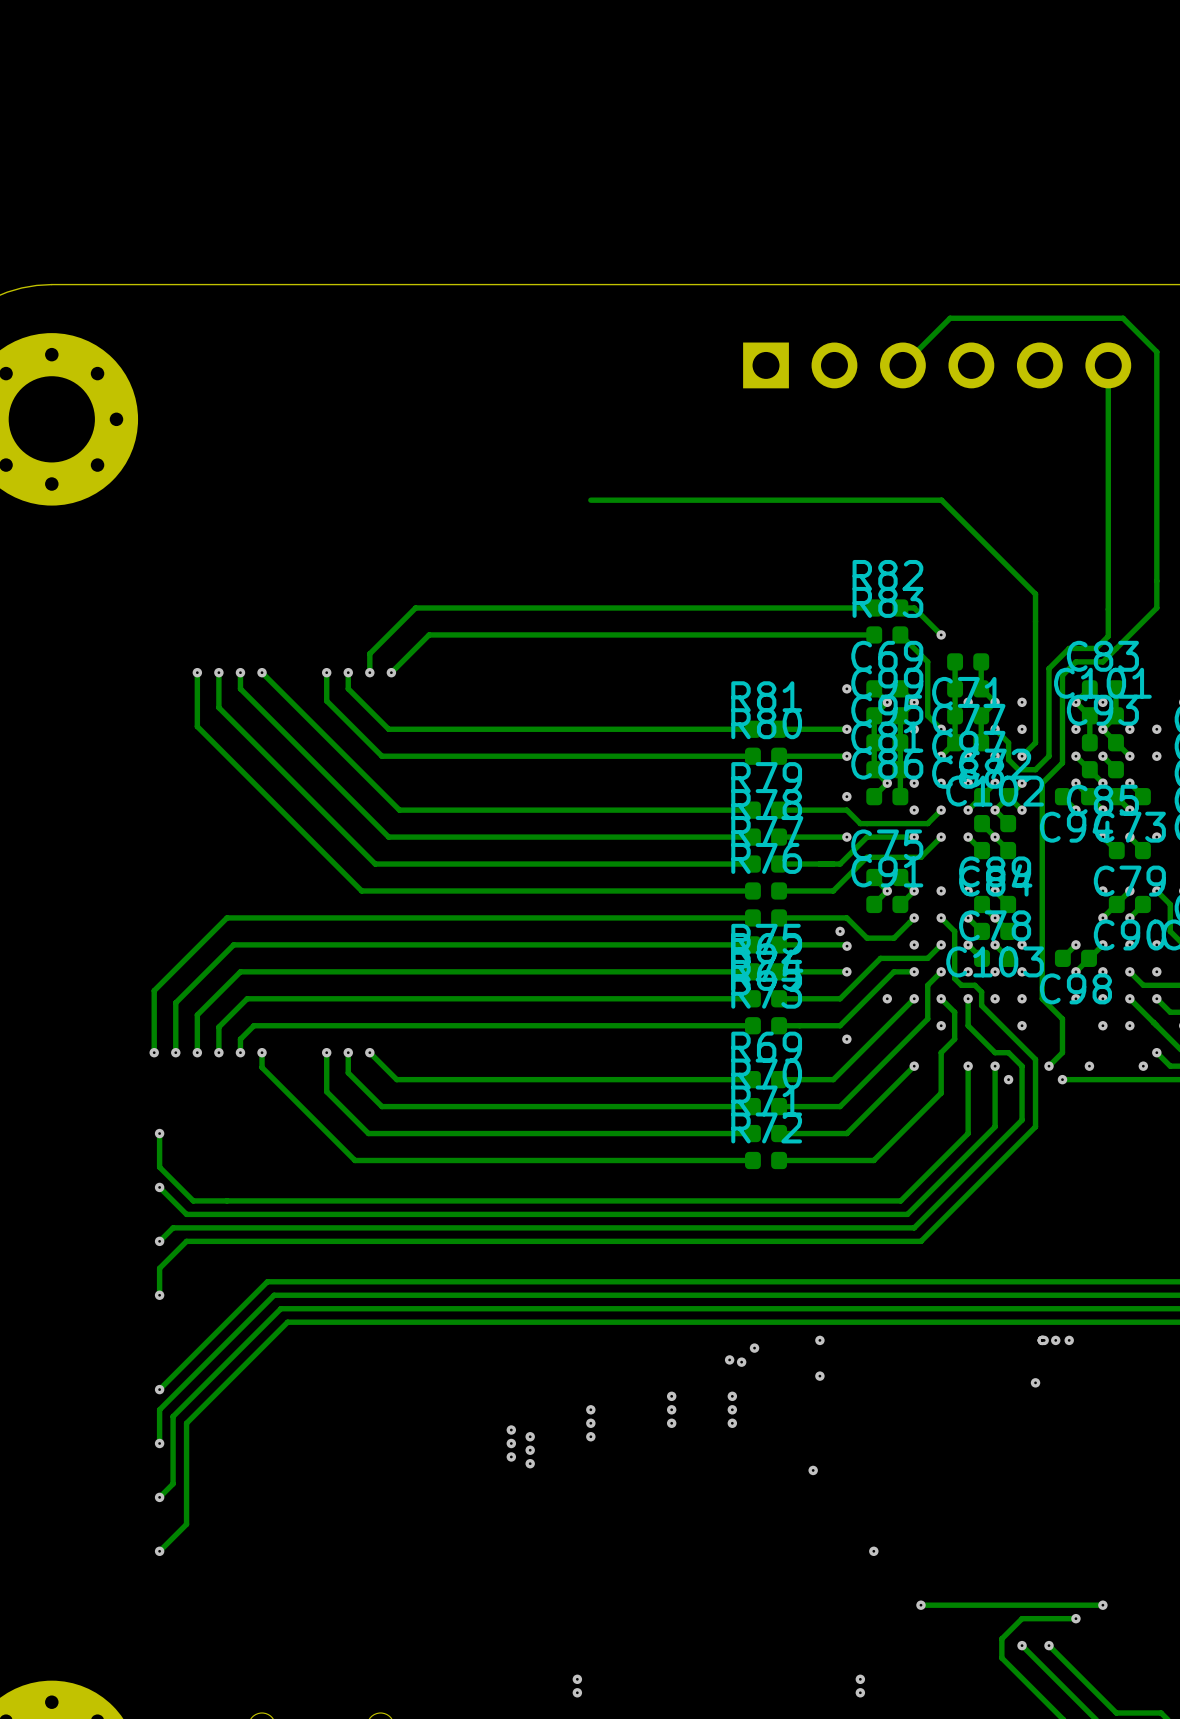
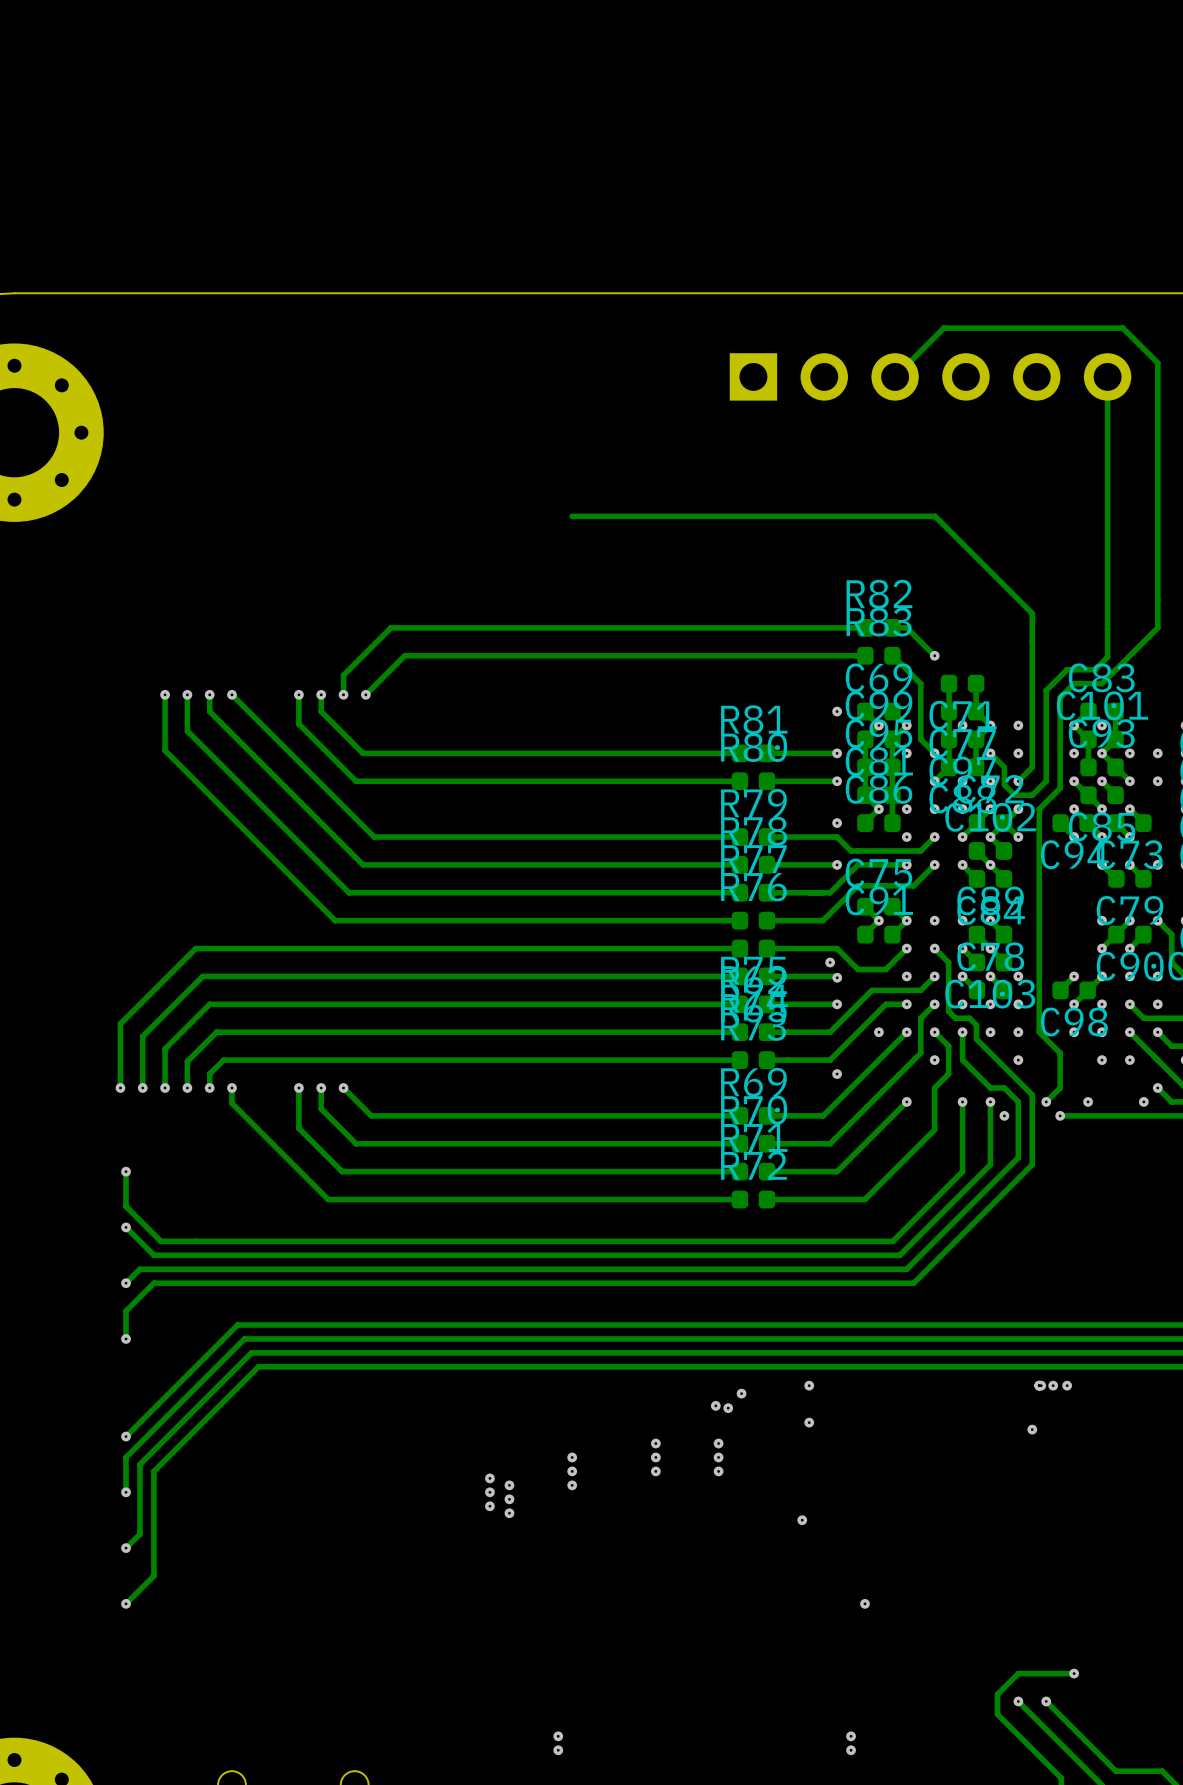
via: (920, 1605) -> none
track: (1102, 1605) (920, 1605) -> none
via: (1102, 1605) -> none

